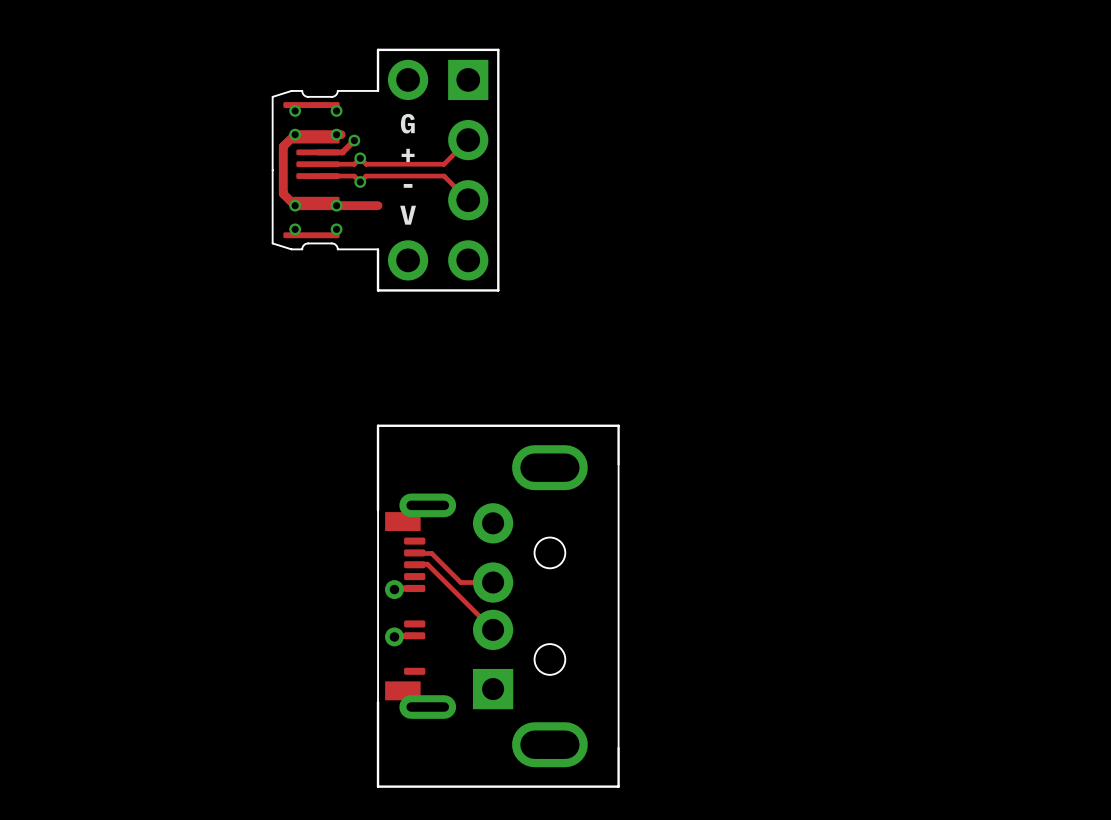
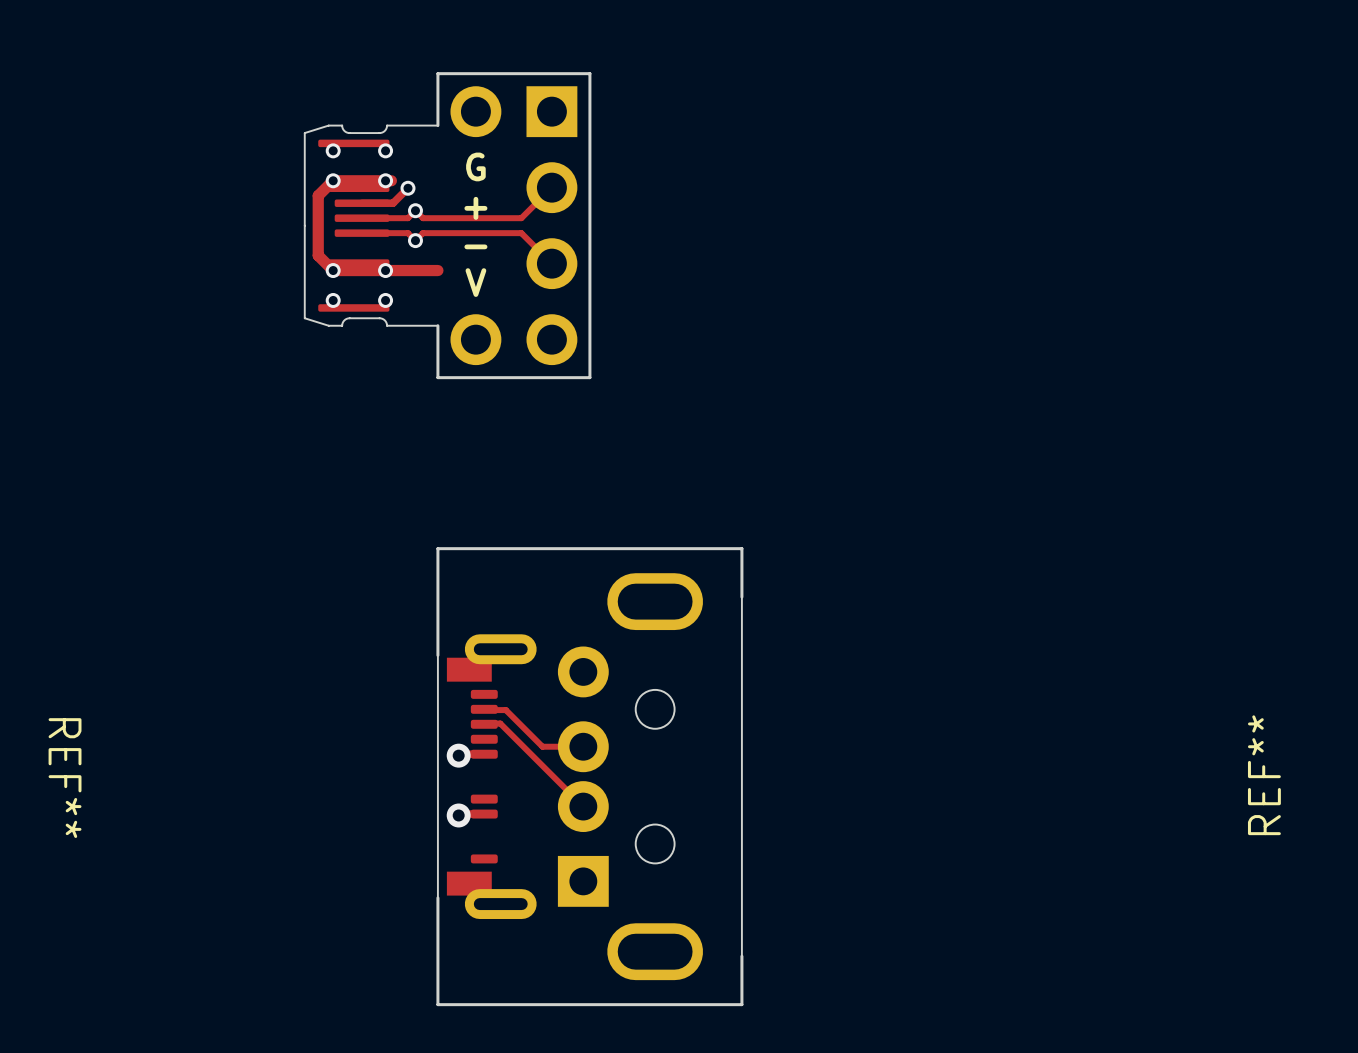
REF** name: none -> REF** (1264, 775)
REF** name: none -> REF** (65, 778)

